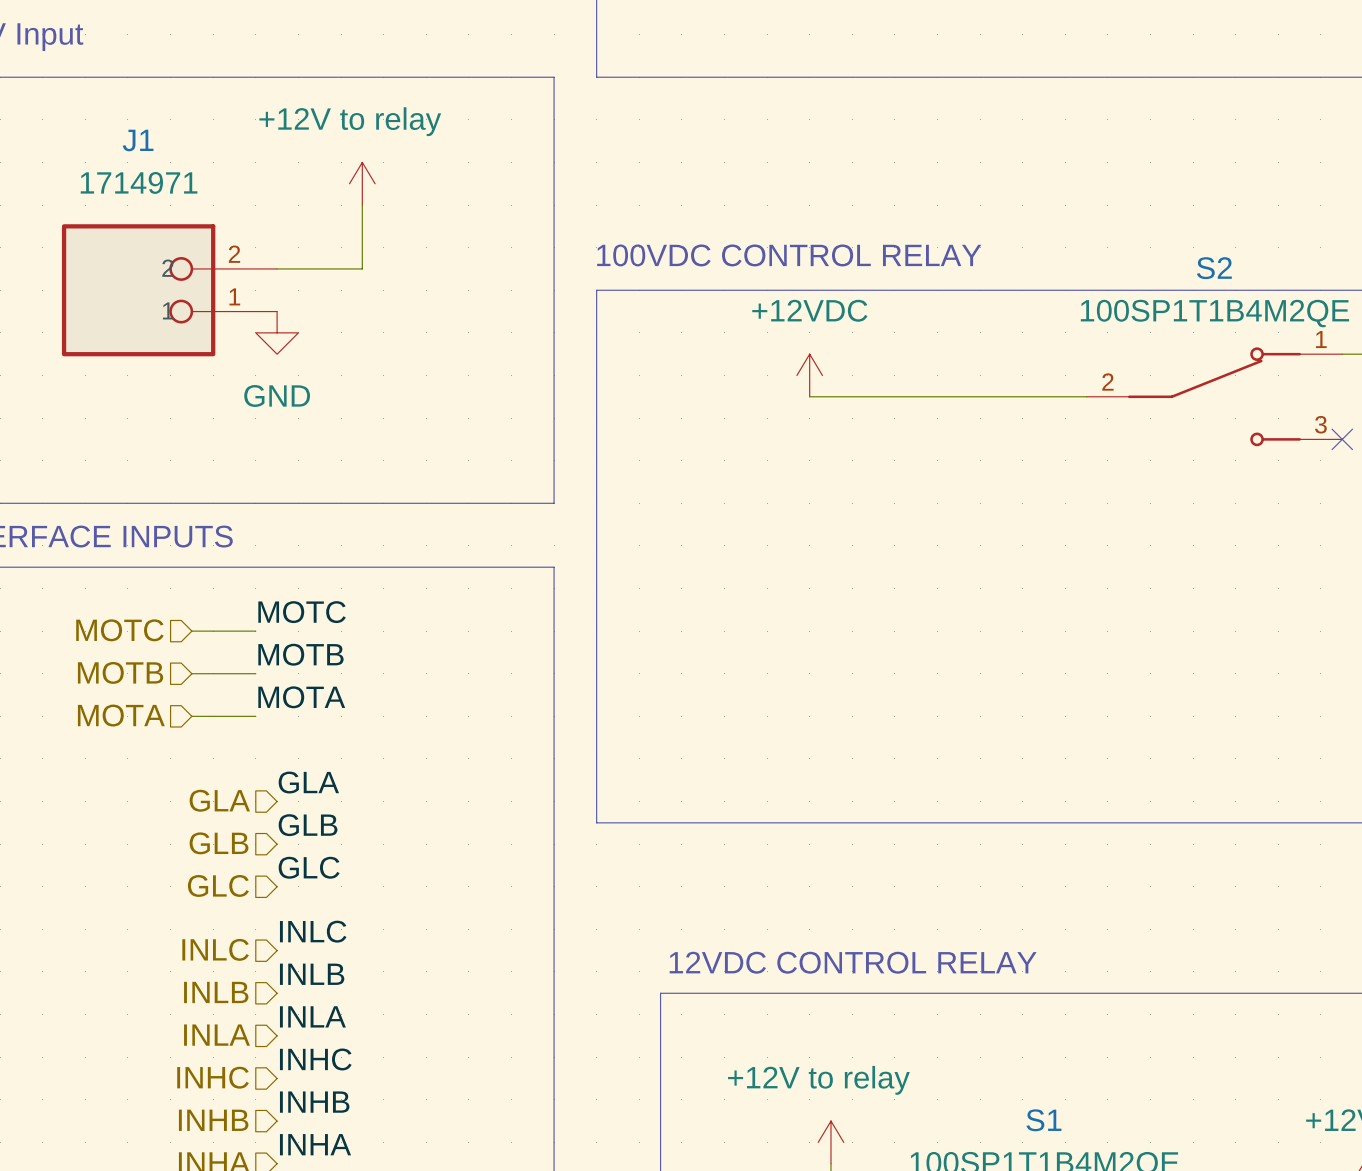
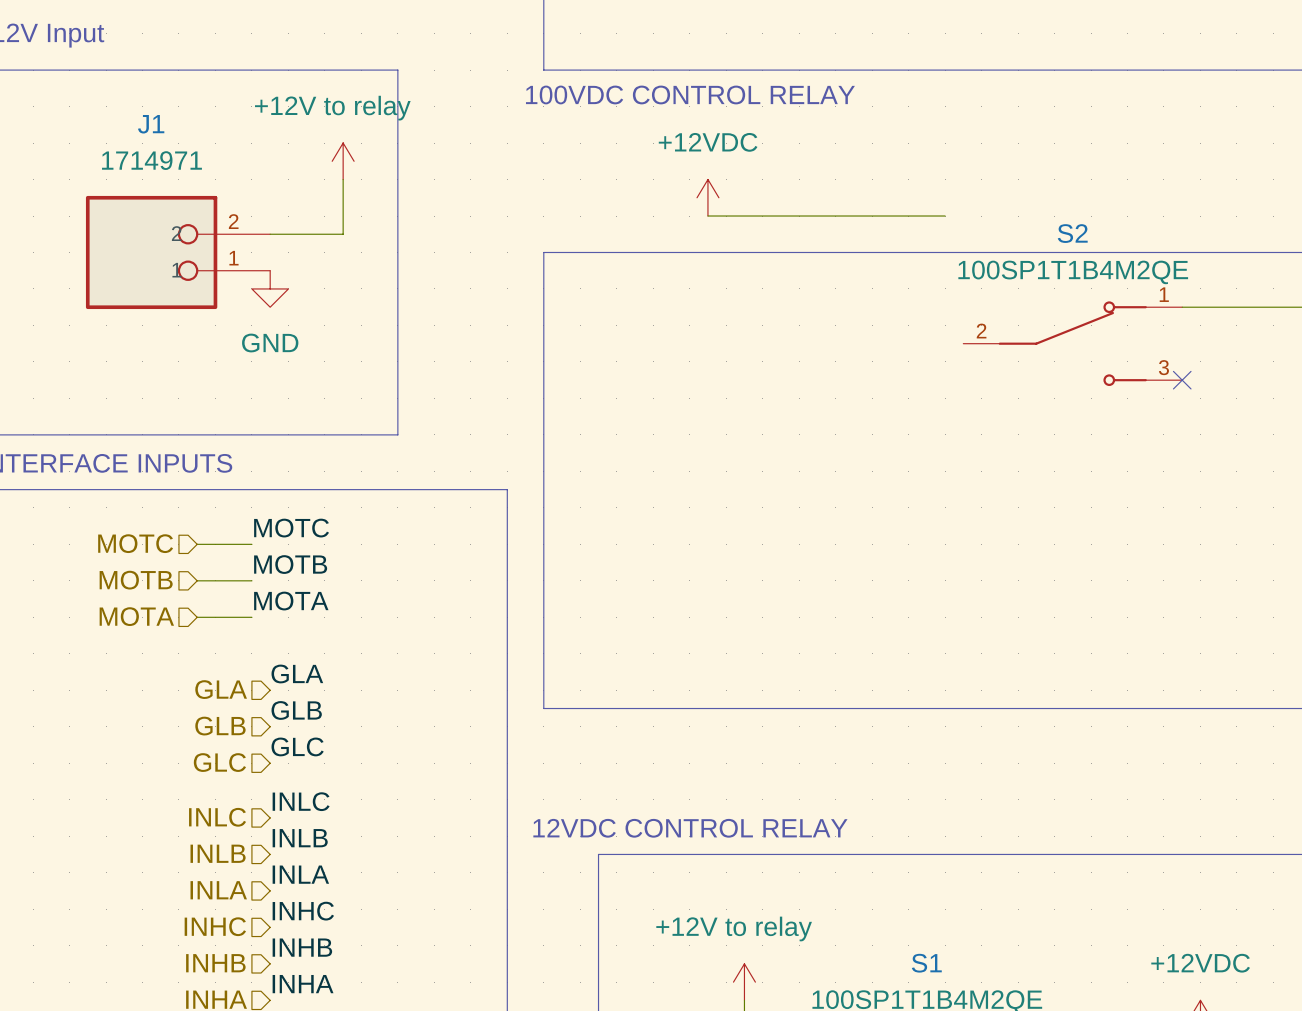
line: (426, 77) (554, 77) (554, 503) (426, 503) -> (397, 70) (397, 434)
text position: 100VDC CONTROL RELAY (789, 255) -> 100VDC CONTROL RELAY (690, 94)
power symbol position: +12VDC (809, 375) -> +12VDC (707, 197)
wire: (809, 396) (1086, 396) -> (707, 216) (945, 216)
text position: 12VDC CONTROL RELAY (853, 962) -> 12VDC CONTROL RELAY (690, 828)

